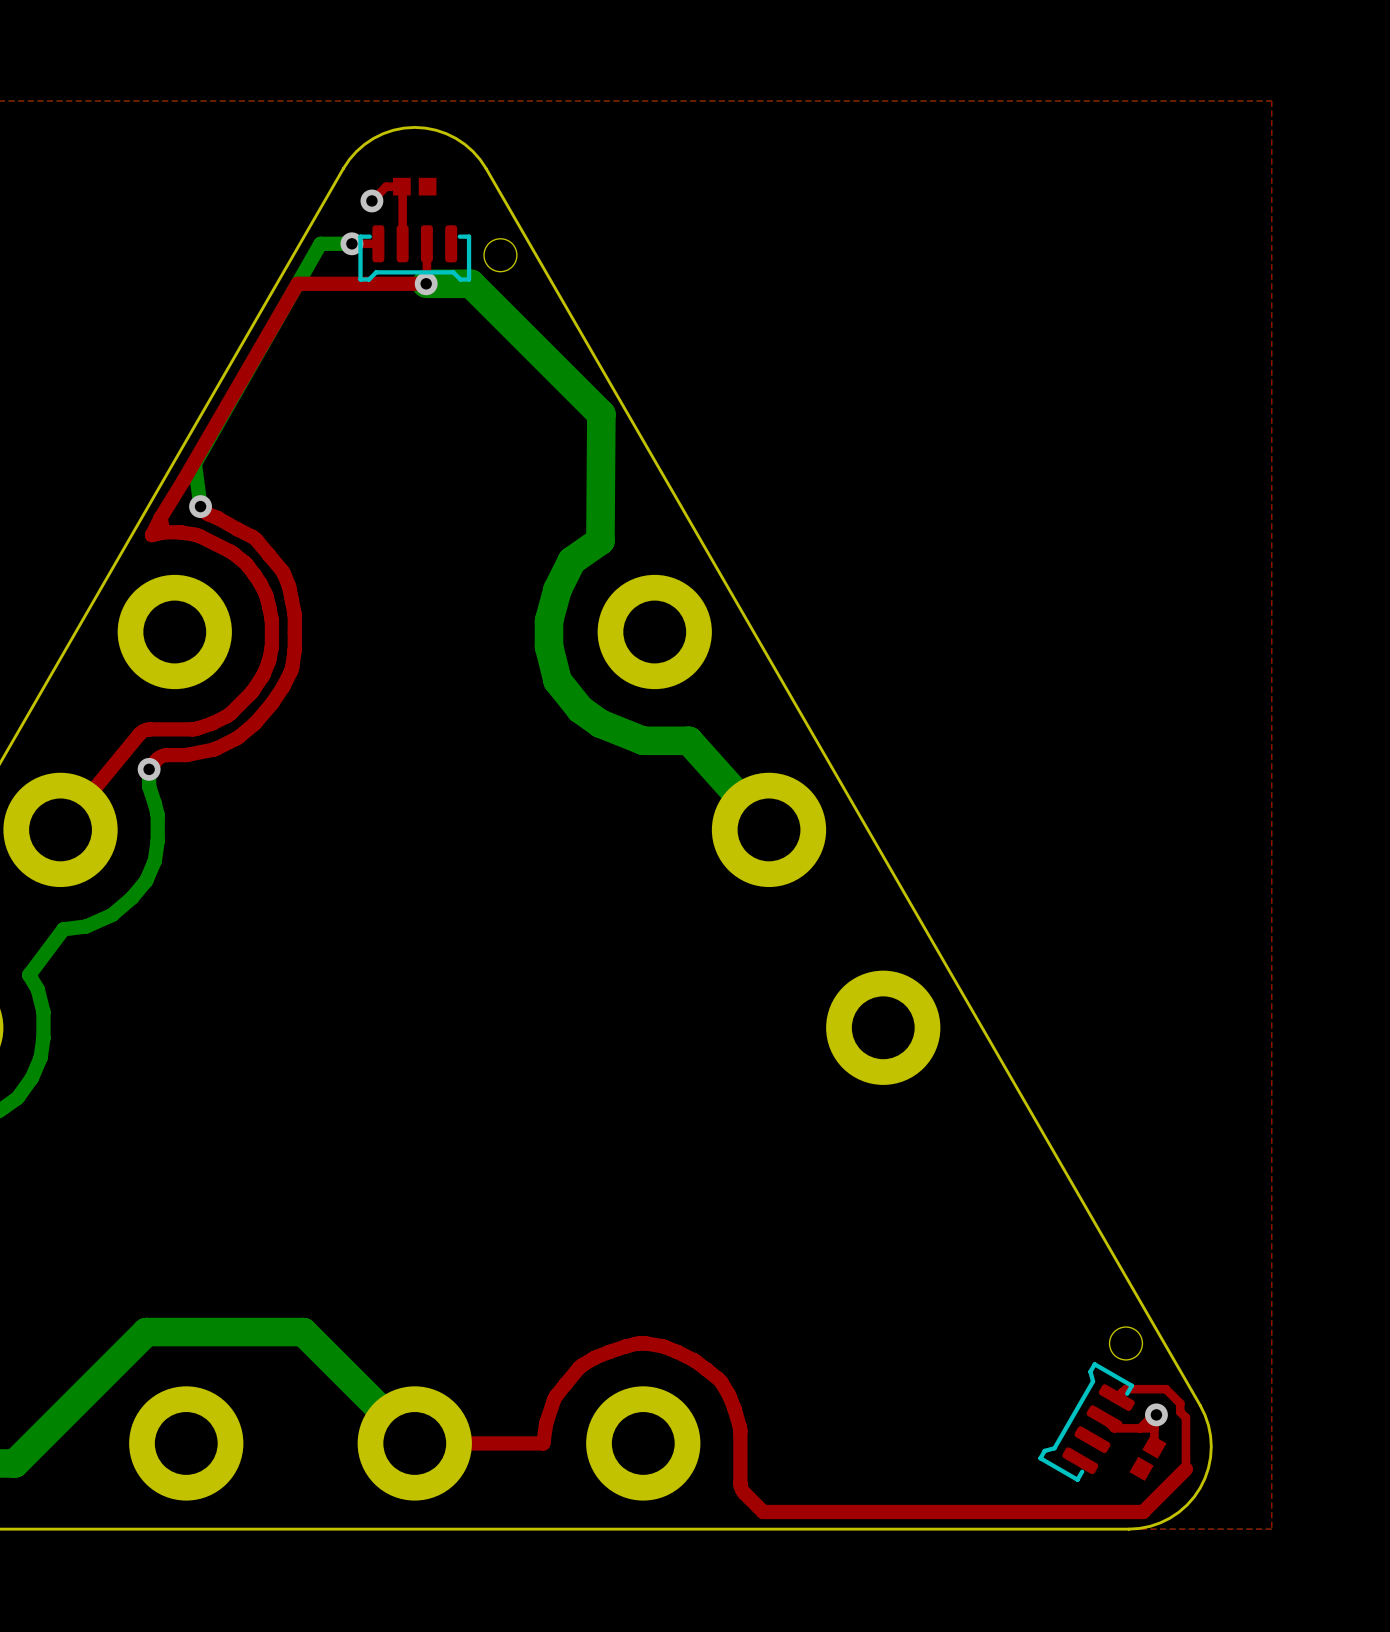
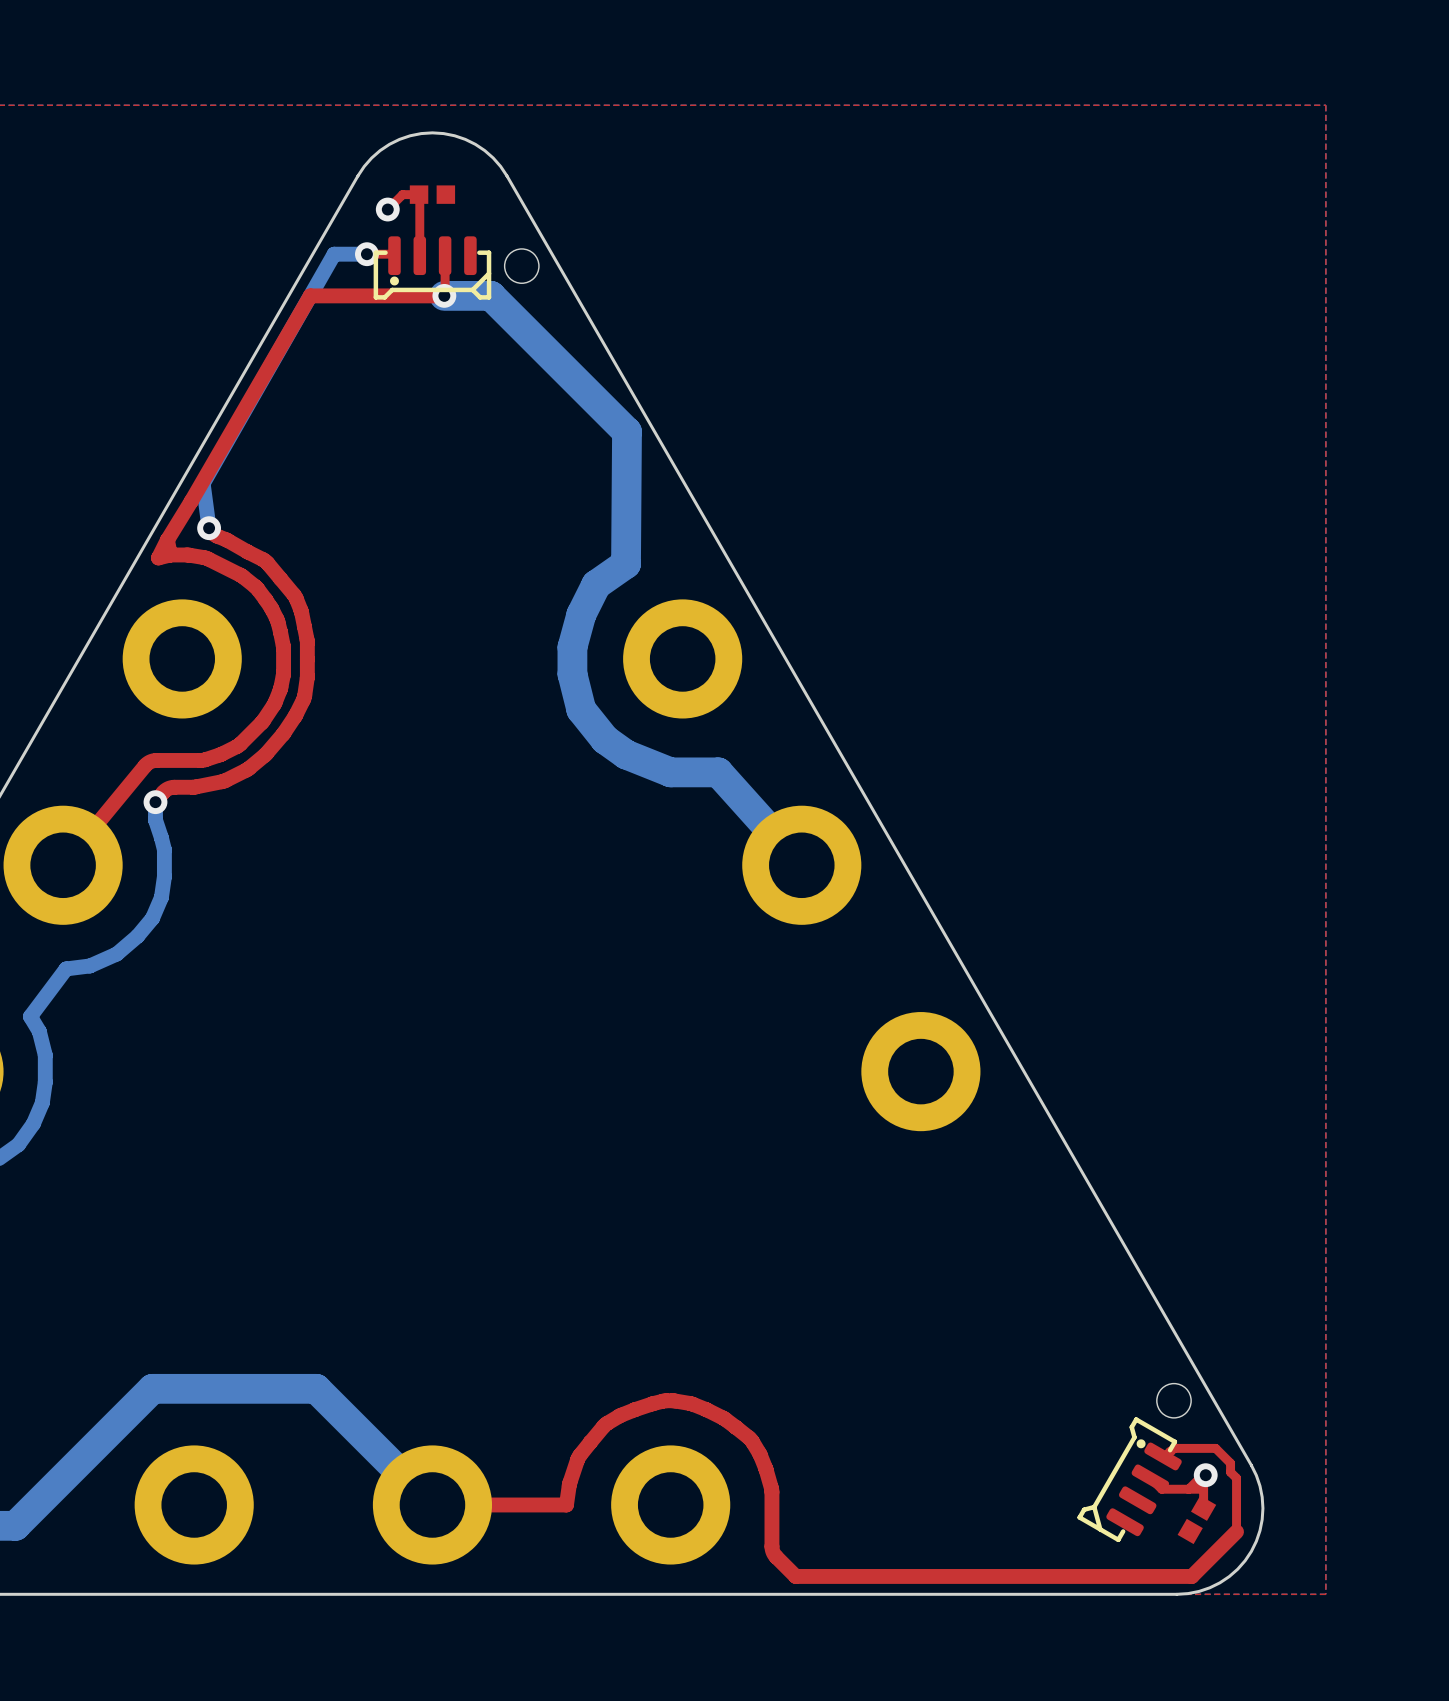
part footprint: [358, 225, 472, 282] -> [373, 236, 492, 300]
part footprint: [1038, 1362, 1135, 1482] -> [1077, 1417, 1182, 1543]

